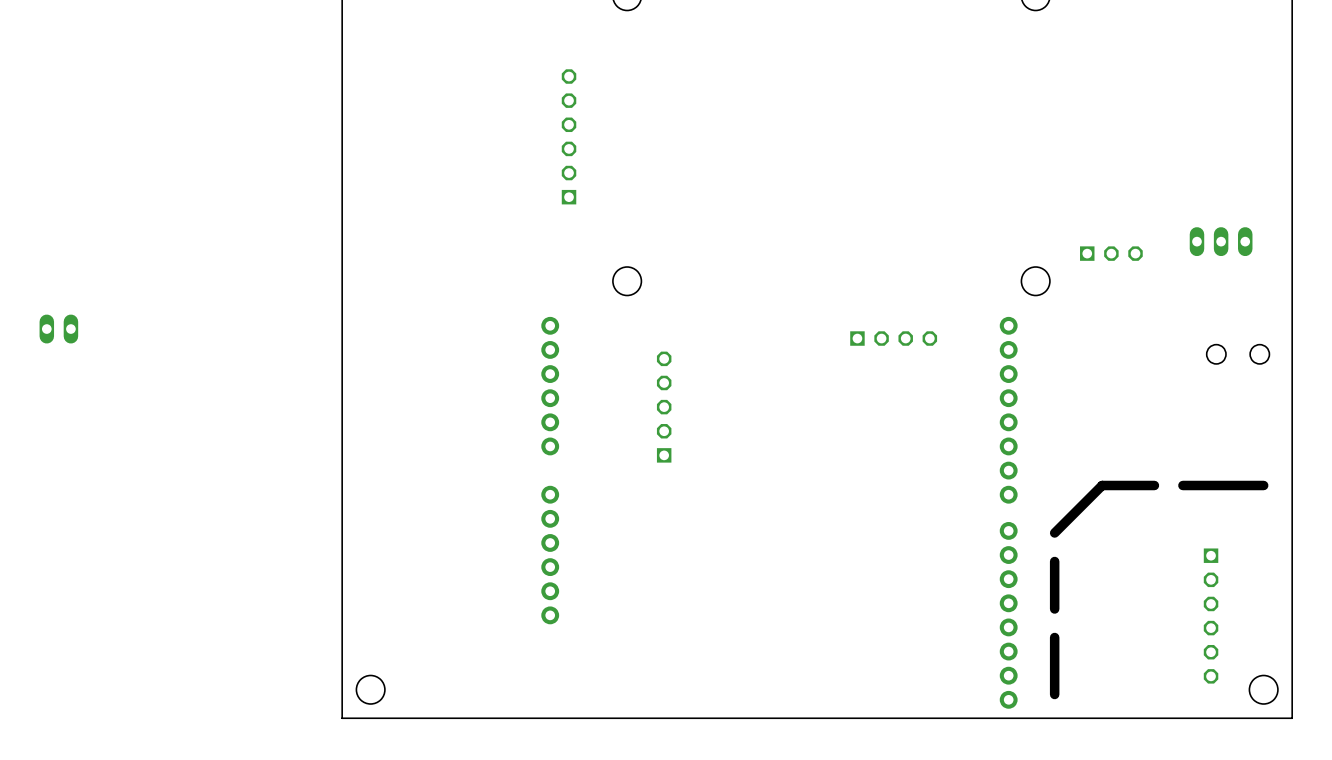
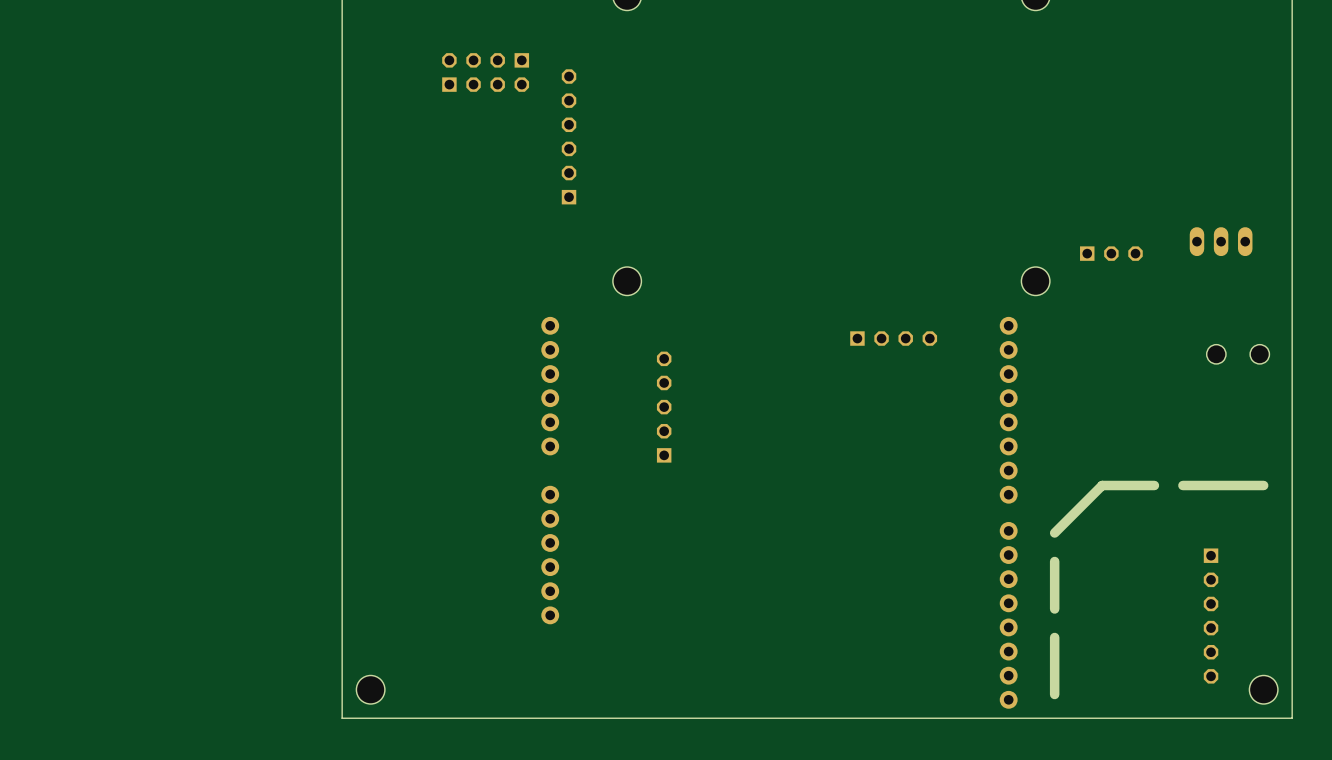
part: none -> (485, 60)
part: none -> (485, 84)
part: (58, 329) -> none

